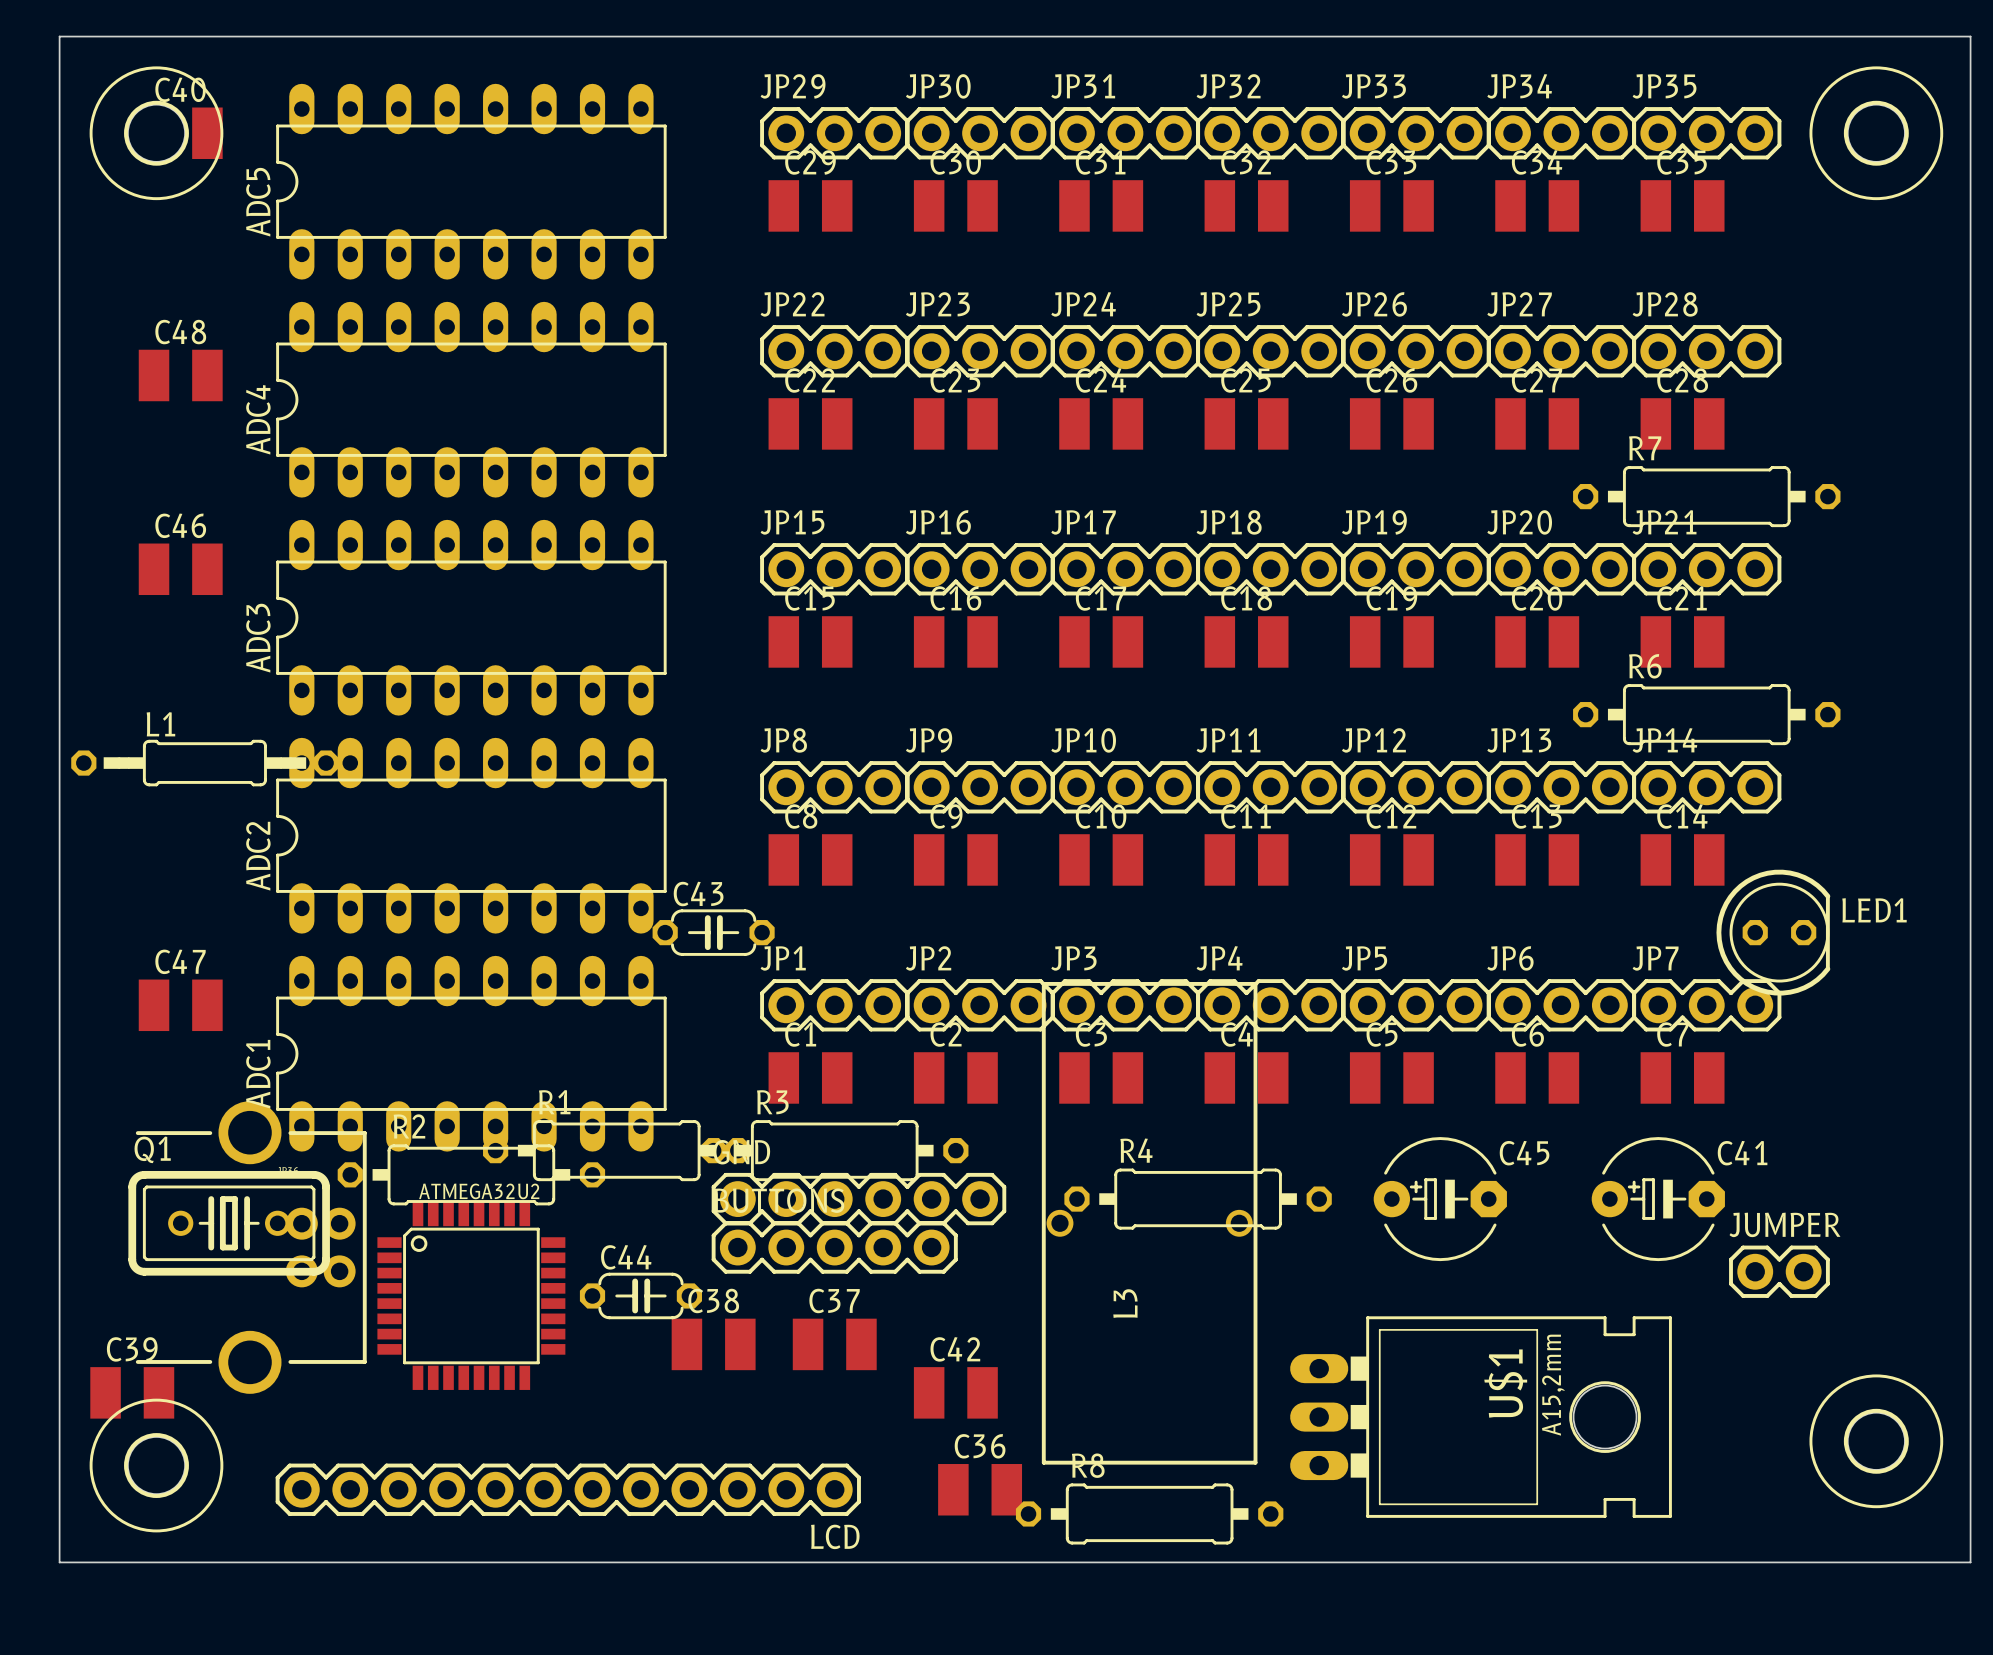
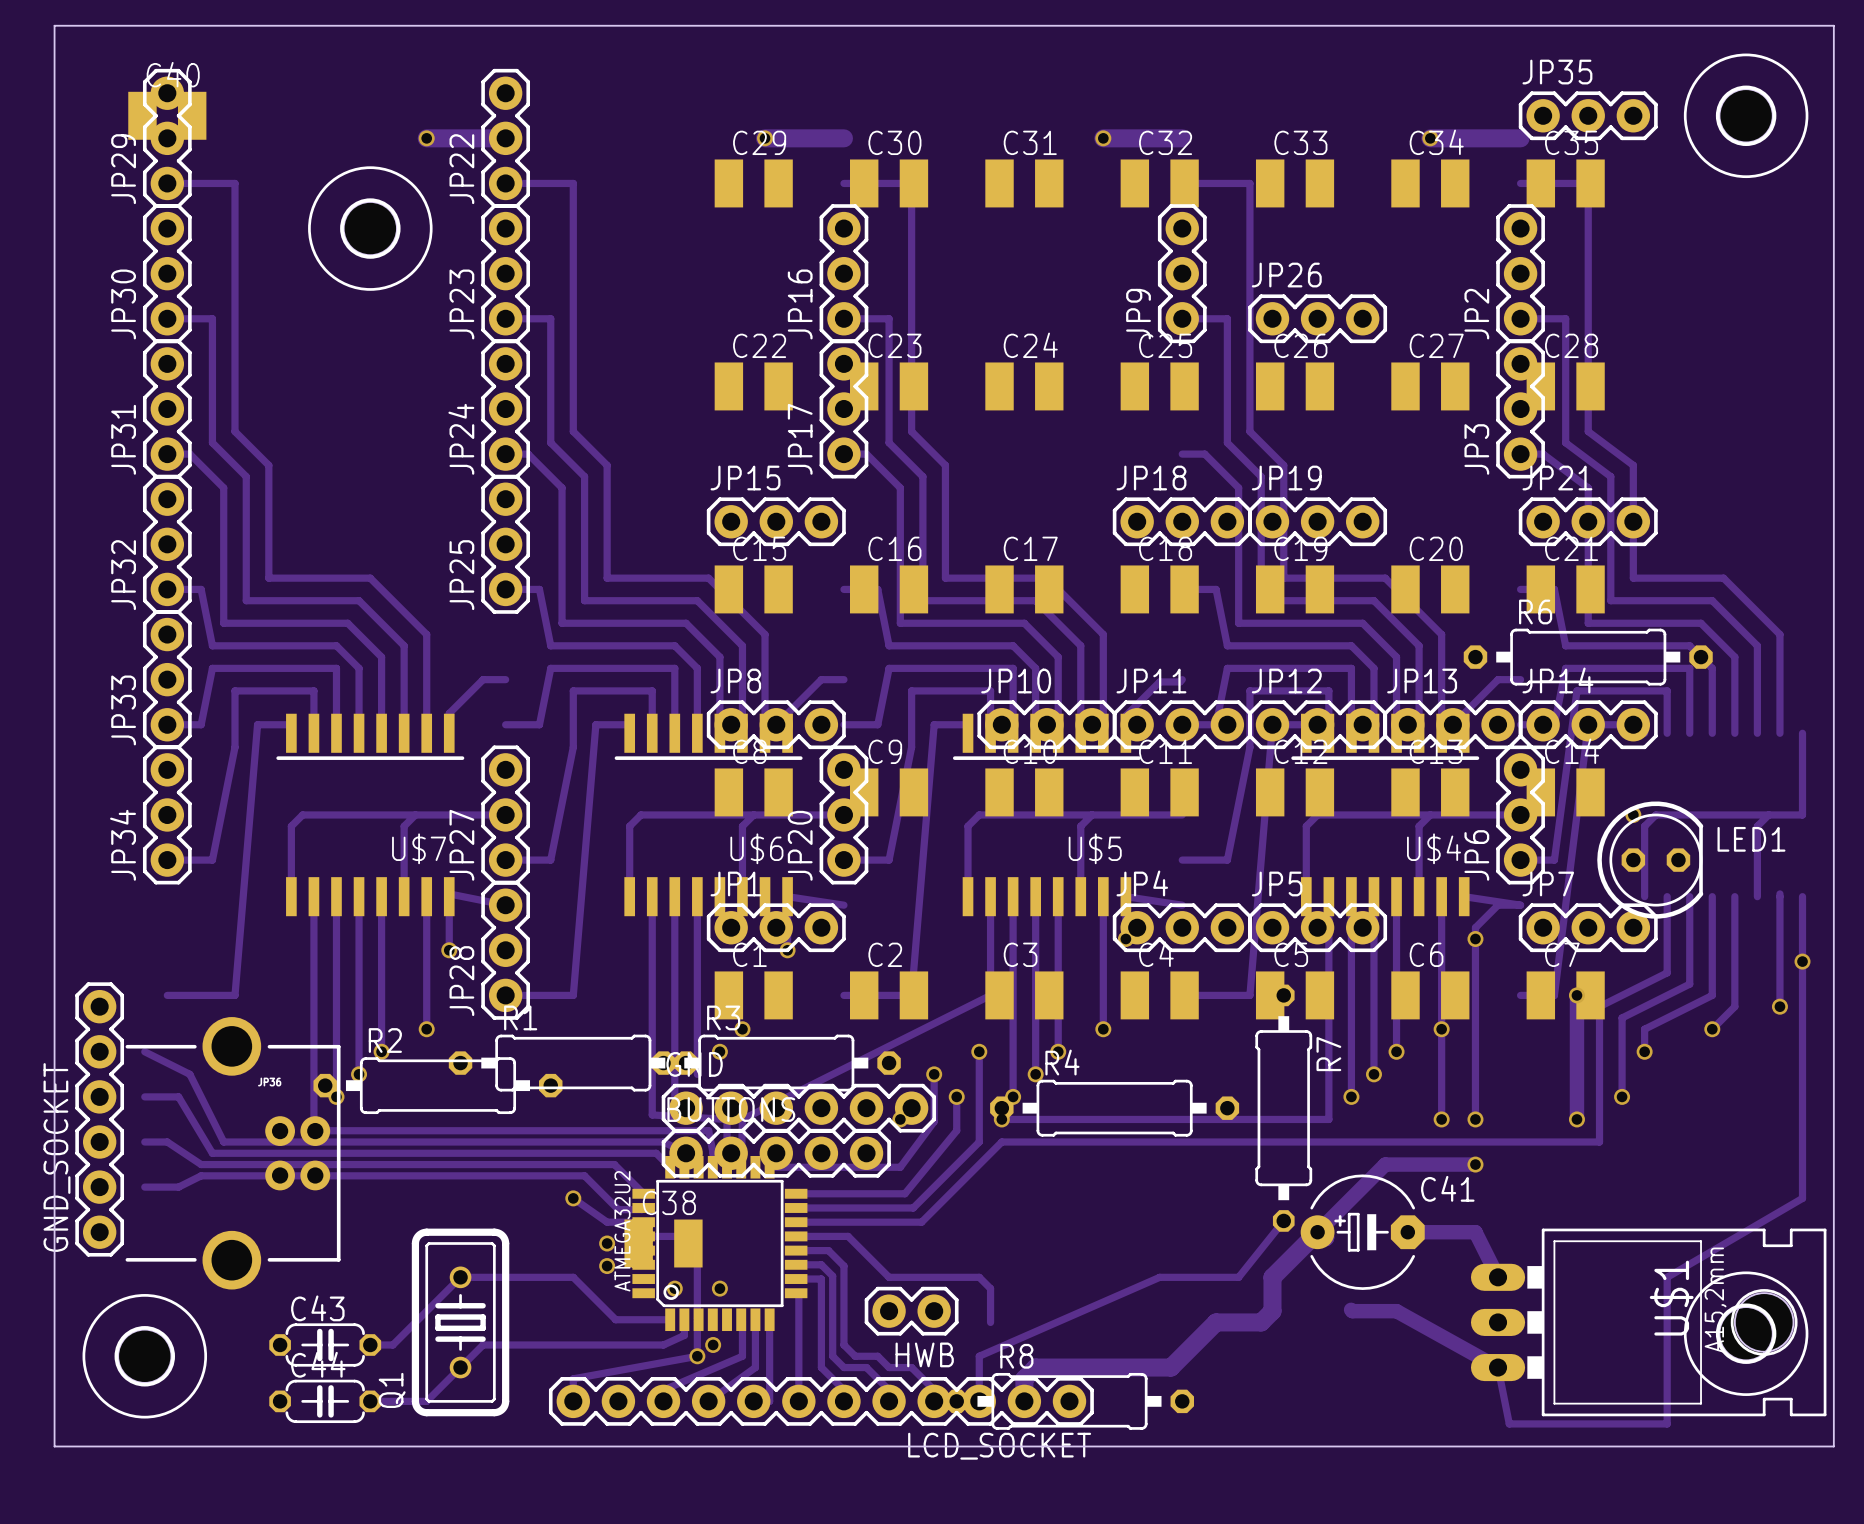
JP29 name position: JP29 (793, 86) -> JP29 (123, 169)
JP30 name position: JP30 (938, 86) -> JP30 (123, 304)
JP31 name position: JP31 (1083, 86) -> JP31 (123, 439)
JP32 name position: JP32 (1228, 86) -> JP32 (123, 575)
JP33 name position: JP33 (1373, 86) -> JP33 (123, 710)
JP34 name position: JP34 (1519, 86) -> JP34 (123, 845)
part position: (156, 133) -> (370, 228)
JP29 rotation: 0° (834, 133) -> 90° clockwise (167, 138)
JP29 position: (834, 133) -> (167, 138)
JP30 rotation: 0° (980, 133) -> 90° clockwise (167, 273)
JP30 position: (980, 133) -> (167, 273)
JP31 rotation: 0° (1125, 133) -> 90° clockwise (167, 409)
JP31 position: (1125, 133) -> (167, 409)
JP32 rotation: 0° (1270, 133) -> 90° clockwise (167, 544)
JP32 position: (1270, 133) -> (167, 544)
JP33 rotation: 0° (1416, 133) -> 90° clockwise (167, 679)
JP33 position: (1416, 133) -> (167, 679)
JP34 rotation: 0° (1561, 133) -> 90° clockwise (167, 814)
JP34 position: (1561, 133) -> (167, 814)
track: none -> (426, 138) (505, 138)
via: none -> (426, 138)
track: none -> (765, 138) (843, 138)
via: none -> (765, 138)
track: none -> (1103, 138) (1182, 138)
via: none -> (1103, 138)
track: none -> (1430, 138) (1520, 138)
via: none -> (1430, 138)
ADC5: (471, 181) -> none
track: none -> (167, 183) (234, 183) (234, 431) (268, 465) (268, 578) (370, 578) (426, 634) (426, 733)
track: none -> (505, 183) (573, 183) (573, 431) (607, 465) (607, 578) (708, 578) (765, 634) (765, 733)
track: none -> (843, 183) (911, 183) (911, 431) (945, 465) (945, 578) (1046, 578) (1103, 634) (1103, 733)
track: none -> (1182, 183) (1249, 183) (1249, 431) (1283, 465) (1283, 578) (1385, 578) (1441, 634) (1441, 733)
track: none -> (1520, 183) (1588, 183) (1588, 431) (1633, 465) (1633, 578) (1723, 578) (1779, 634) (1779, 733)
JP22 name position: JP22 (792, 304) -> JP22 (461, 169)
JP23 name position: JP23 (937, 304) -> JP23 (461, 304)
JP24 name position: JP24 (1083, 304) -> JP24 (461, 439)
JP25 name position: JP25 (1228, 304) -> JP25 (461, 575)
JP27 name position: JP27 (1519, 304) -> JP27 (461, 845)
JP28 name position: JP28 (1665, 304) -> JP28 (461, 981)
track: none -> (167, 318) (212, 318) (212, 442) (246, 476) (246, 600) (359, 600) (404, 645) (404, 733)
track: none -> (505, 318) (550, 318) (550, 442) (584, 476) (584, 600) (697, 600) (742, 645) (742, 733)
JP22 rotation: 0° (834, 351) -> 90° clockwise (505, 138)
JP22 position: (834, 351) -> (505, 138)
track: none -> (843, 318) (889, 318) (889, 442) (922, 476) (922, 600) (1035, 600) (1080, 645) (1080, 733)
JP23 rotation: 0° (980, 351) -> 90° clockwise (505, 273)
JP23 position: (980, 351) -> (505, 273)
JP24 rotation: 0° (1125, 351) -> 90° clockwise (505, 409)
JP24 position: (1125, 351) -> (505, 409)
track: none -> (1182, 318) (1227, 318) (1227, 442) (1261, 476) (1261, 600) (1373, 600) (1419, 645) (1419, 733)
JP25 rotation: 0° (1270, 351) -> 90° clockwise (505, 544)
JP25 position: (1270, 351) -> (505, 544)
JP27 rotation: 0° (1561, 351) -> 90° clockwise (505, 814)
JP27 position: (1561, 351) -> (505, 814)
track: none -> (1520, 318) (1565, 318) (1565, 442) (1610, 476) (1610, 600) (1712, 600) (1757, 645) (1757, 733)
JP28 rotation: 0° (1706, 351) -> 90° clockwise (505, 950)
JP28 position: (1706, 351) -> (505, 950)
C48: (180, 375) -> none
ADC4: (471, 399) -> none
R7 name position: R7 (1645, 448) -> R7 (1328, 1054)
R7 footprint: [1573, 466, 1841, 528] -> [1255, 984, 1313, 1232]
track: none -> (167, 454) (189, 454) (223, 487) (223, 623) (347, 623) (381, 657) (381, 733)
track: none -> (505, 454) (528, 454) (562, 487) (562, 623) (686, 623) (719, 657) (719, 733)
track: none -> (843, 454) (866, 454) (900, 487) (900, 623) (1024, 623) (1058, 657) (1058, 733)
track: none -> (1182, 454) (1204, 454) (1238, 487) (1238, 623) (1362, 623) (1396, 657) (1396, 733)
track: none -> (1520, 454) (1543, 454) (1588, 487) (1588, 623) (1701, 623) (1734, 657) (1734, 733)
JP16 name position: JP16 (938, 522) -> JP16 (800, 304)
JP17 name position: JP17 (1083, 522) -> JP17 (800, 439)
JP20 name position: JP20 (1519, 522) -> JP20 (800, 845)
C46: (180, 569) -> none
JP16 rotation: 0° (980, 569) -> 90° clockwise (843, 273)
JP16 position: (980, 569) -> (843, 273)
JP17 rotation: 0° (1125, 569) -> 90° clockwise (843, 409)
JP17 position: (1125, 569) -> (843, 409)
JP20 rotation: 0° (1561, 569) -> 90° clockwise (843, 814)
JP20 position: (1561, 569) -> (843, 814)
ADC3: (471, 617) -> none
track: none -> (167, 589) (201, 589) (212, 645) (336, 645) (359, 668) (359, 733)
track: none -> (505, 589) (539, 589) (550, 645) (674, 645) (697, 668) (697, 733)
track: none -> (843, 589) (877, 589) (889, 645) (1013, 645) (1035, 668) (1035, 733)
track: none -> (1182, 589) (1216, 589) (1227, 645) (1351, 645) (1373, 668) (1373, 733)
track: none -> (1520, 589) (1554, 589) (1565, 645) (1689, 645) (1712, 668) (1712, 733)
track: none -> (505, 679) (483, 679) (449, 713) (449, 733)
track: none -> (843, 679) (821, 679) (787, 713) (787, 733)
track: none -> (1182, 679) (1179, 681) (1159, 681) (1125, 715) (1125, 733)
track: none -> (1520, 679) (1498, 679) (1464, 713) (1464, 733)
JP9 name position: JP9 (929, 740) -> JP9 (1138, 314)
L1: (204, 763) -> none
track: none -> (167, 724) (201, 724) (212, 668) (336, 668) (336, 733)
track: none -> (505, 724) (539, 724) (550, 668) (674, 668) (674, 733)
track: none -> (843, 724) (877, 724) (889, 668) (1013, 668) (1013, 733)
JP9 rotation: 0° (980, 787) -> 90° clockwise (1182, 273)
JP9 position: (980, 787) -> (1182, 273)
track: none -> (1182, 724) (1216, 724) (1227, 668) (1351, 668) (1351, 733)
track: none -> (1520, 724) (1554, 724) (1565, 668) (1689, 668) (1689, 733)
track: none -> (291, 733) (291, 724) (257, 724) (234, 995) (167, 995)
track: none -> (313, 733) (313, 690) (234, 690) (234, 747) (212, 860) (167, 860)
track: none -> (629, 733) (629, 724) (595, 724) (573, 995) (505, 995)
track: none -> (652, 733) (652, 690) (573, 690) (573, 747) (550, 860) (505, 860)
track: none -> (968, 733) (968, 724) (934, 724) (911, 995) (843, 995)
track: none -> (990, 733) (990, 690) (911, 690) (911, 747) (889, 860) (843, 860)
track: none -> (1306, 733) (1306, 724) (1272, 724) (1249, 995) (1182, 995)
track: none -> (1328, 733) (1328, 690) (1249, 690) (1249, 747) (1227, 860) (1182, 860)
track: none -> (1644, 733) (1644, 724) (1588, 724) (1554, 995) (1520, 995)
track: none -> (1667, 733) (1667, 690) (1576, 690) (1554, 860) (1520, 860)
track: none -> (1802, 733) (1802, 814) (1655, 814) (1644, 826) (1644, 896)
ADC2: (471, 835) -> none
U$7: none -> (370, 814)
track: none -> (415, 814) (404, 826) (404, 896)
track: none -> (505, 814) (302, 814) (291, 826) (291, 896)
U$6: none -> (708, 814)
track: none -> (753, 814) (742, 826) (742, 896)
track: none -> (843, 814) (640, 814) (629, 826) (629, 896)
U$5: none -> (1046, 814)
track: none -> (1092, 814) (1080, 826) (1080, 896)
track: none -> (1182, 814) (979, 814) (968, 826) (968, 896)
U$4: none -> (1385, 814)
track: none -> (1430, 814) (1419, 826) (1419, 896)
track: none -> (1520, 814) (1317, 814) (1306, 826) (1306, 896)
via: none -> (1633, 814)
track: none -> (1768, 814) (1757, 826) (1757, 896)
C43 footprint: [652, 909, 775, 956] -> [269, 1323, 382, 1367]
JP2 name position: JP2 (928, 958) -> JP2 (1476, 314)
JP3 name position: JP3 (1073, 958) -> JP3 (1476, 449)
JP6 name position: JP6 (1510, 958) -> JP6 (1476, 855)
track: none -> (1779, 893) (1779, 1006)
track: none -> (313, 896) (313, 1130) (708, 1130) (713, 1153) (712, 1167)
track: none -> (336, 896) (336, 1096)
track: none -> (359, 896) (359, 1074)
track: none -> (381, 896) (381, 1051)
track: none -> (426, 896) (426, 1029)
track: none -> (652, 896) (652, 1114) (727, 1119) (727, 1167)
track: none -> (674, 896) (674, 1096)
track: none -> (697, 896) (697, 1074)
track: none -> (990, 896) (990, 995) (742, 1119) (741, 1167)
track: none -> (1013, 896) (1013, 1096)
track: none -> (1035, 896) (1035, 1074)
track: none -> (1058, 896) (1058, 1051)
track: none -> (1103, 896) (1103, 1029)
track: none -> (1328, 896) (1328, 1119) (1001, 1119)
track: none -> (1351, 896) (1351, 1096)
track: none -> (1373, 896) (1373, 1074)
track: none -> (1396, 896) (1396, 1051)
track: none -> (1441, 896) (1441, 1119)
track: none -> (1464, 896) (1520, 905) (1498, 905) (1475, 927) (1475, 1119)
track: none -> (1667, 896) (1667, 972) (1599, 1006) (1599, 1142) (1001, 1142) (921, 1222) (796, 1222)
track: none -> (1689, 896) (1689, 984) (1622, 1017) (1622, 1096)
track: none -> (1712, 896) (1712, 995) (1644, 1029) (1644, 1051)
track: none -> (1734, 896) (1734, 1006) (1712, 1029)
track: none -> (1802, 896) (1802, 1198) (1667, 1277) (1667, 1423) (1509, 1423) (1498, 1367) (1396, 1311) (1351, 1309)
track: none -> (505, 905) (449, 893) (449, 950)
track: none -> (843, 905) (787, 896) (787, 950)
track: none -> (1182, 905) (1125, 896) (1125, 939)
C47: (180, 1005) -> none
JP2 rotation: 0° (980, 1005) -> 90° clockwise (1520, 273)
JP2 position: (980, 1005) -> (1520, 273)
JP3 rotation: 0° (1125, 1005) -> 90° clockwise (1520, 409)
JP3 position: (1125, 1005) -> (1520, 409)
JP6 rotation: 0° (1561, 1005) -> 90° clockwise (1520, 814)
JP6 position: (1561, 1005) -> (1520, 814)
via: none -> (1125, 939)
via: none -> (1475, 939)
via: none -> (449, 950)
via: none -> (787, 950)
via: none -> (1802, 961)
ADC1: (471, 1053) -> none
track: none -> (1576, 995) (1576, 1119)
via: none -> (1576, 995)
via: none -> (1779, 1006)
via: none -> (426, 1029)
via: none -> (742, 1029)
via: none -> (1103, 1029)
via: none -> (1441, 1029)
via: none -> (1712, 1029)
track: none -> (144, 1051) (189, 1074) (223, 1142) (663, 1142) (686, 1153) (684, 1167) (686, 1164)
via: none -> (381, 1051)
via: none -> (719, 1051)
track: none -> (979, 1051) (979, 1142) (913, 1207) (796, 1207)
via: none -> (979, 1051)
via: none -> (1058, 1051)
via: none -> (1396, 1051)
via: none -> (1644, 1051)
Q1 name position: Q1 (152, 1149) -> Q1 (392, 1390)
via: none -> (359, 1074)
track: none -> (934, 1074) (934, 1121) (900, 1167) (769, 1167)
via: none -> (934, 1074)
via: none -> (1035, 1074)
via: none -> (1373, 1074)
Q1 footprint: [128, 1170, 330, 1276] -> [411, 1228, 510, 1417]
track: none -> (144, 1096) (178, 1096) (212, 1153) (656, 1153) (670, 1167)
via: none -> (336, 1096)
track: none -> (956, 1096) (956, 1130) (904, 1193) (796, 1193)
via: none -> (956, 1096)
via: none -> (1013, 1096)
via: none -> (1351, 1096)
via: none -> (1622, 1096)
C45: (1440, 1199) -> none
C41 position: (1658, 1199) -> (1362, 1232)
GND_SOCKET: none -> (99, 1119)
via: none -> (900, 1119)
via: none -> (1001, 1119)
via: none -> (1441, 1119)
via: none -> (1475, 1119)
via: none -> (1576, 1119)
L3: (1149, 1223) -> none
track: none -> (144, 1142) (167, 1142) (201, 1164) (614, 1164) (643, 1193)
track: none -> (1475, 1164) (1385, 1164) (1317, 1232) (1325, 1237) (1312, 1237) (1272, 1277) (1272, 1311) (1261, 1322) (1216, 1322) (1170, 1367) (1035, 1367) (1024, 1378) (1024, 1401)
via: none -> (1475, 1164)
JUMPER: (1779, 1271) -> none
C44 footprint: [579, 1272, 702, 1320] -> [269, 1379, 382, 1424]
track: none -> (144, 1187) (178, 1187) (201, 1175) (584, 1175) (618, 1209) (641, 1209) (643, 1207)
ATMEGA32U2 rotation: 0° (471, 1295) -> 90° counterclockwise (719, 1243)
ATMEGA32U2 position: (471, 1295) -> (719, 1243)
track: none -> (573, 1198) (607, 1222) (643, 1222)
via: none -> (573, 1198)
track: none -> (1283, 1220) (1238, 1277) (1159, 1277) (979, 1356) (979, 1401)
track: none -> (1407, 1232) (1475, 1232) (1498, 1277)
track: none -> (643, 1236) (678, 1236) (697, 1254) (697, 1356) (573, 1378) (573, 1401)
track: none -> (796, 1236) (848, 1236) (889, 1277) (979, 1277) (990, 1288) (990, 1322)
via: none -> (607, 1243)
C37: (834, 1344) -> none
track: none -> (796, 1250) (828, 1250) (843, 1266) (843, 1344) (855, 1356) (877, 1356) (889, 1367) (911, 1367) (934, 1390) (934, 1401)
track: none -> (796, 1264) (821, 1264) (832, 1276) (832, 1356) (843, 1367) (866, 1367) (889, 1390) (889, 1401)
via: none -> (607, 1266)
track: none -> (796, 1279) (821, 1279) (821, 1367) (843, 1390) (843, 1401)
C39: (132, 1392) -> none
via: none -> (674, 1288)
via: none -> (719, 1288)
C42: (955, 1392) -> none
track: none -> (796, 1293) (798, 1293) (798, 1401)
HWB: none -> (911, 1311)
U$1 position: (1481, 1417) -> (1648, 1322)
track: none -> (670, 1319) (615, 1319) (573, 1277) (460, 1277) (392, 1344) (370, 1344)
track: none -> (684, 1319) (684, 1335) (663, 1344) (483, 1344) (426, 1401) (370, 1401)
track: none -> (741, 1319) (742, 1356) (663, 1390) (663, 1401)
track: none -> (755, 1319) (755, 1367) (708, 1401)
track: none -> (769, 1319) (769, 1401) (753, 1401)
via: none -> (713, 1344)
via: none -> (697, 1356)
LCD: (568, 1489) -> none
C36: (980, 1489) -> none
LCD_SOCKET: none -> (821, 1401)

